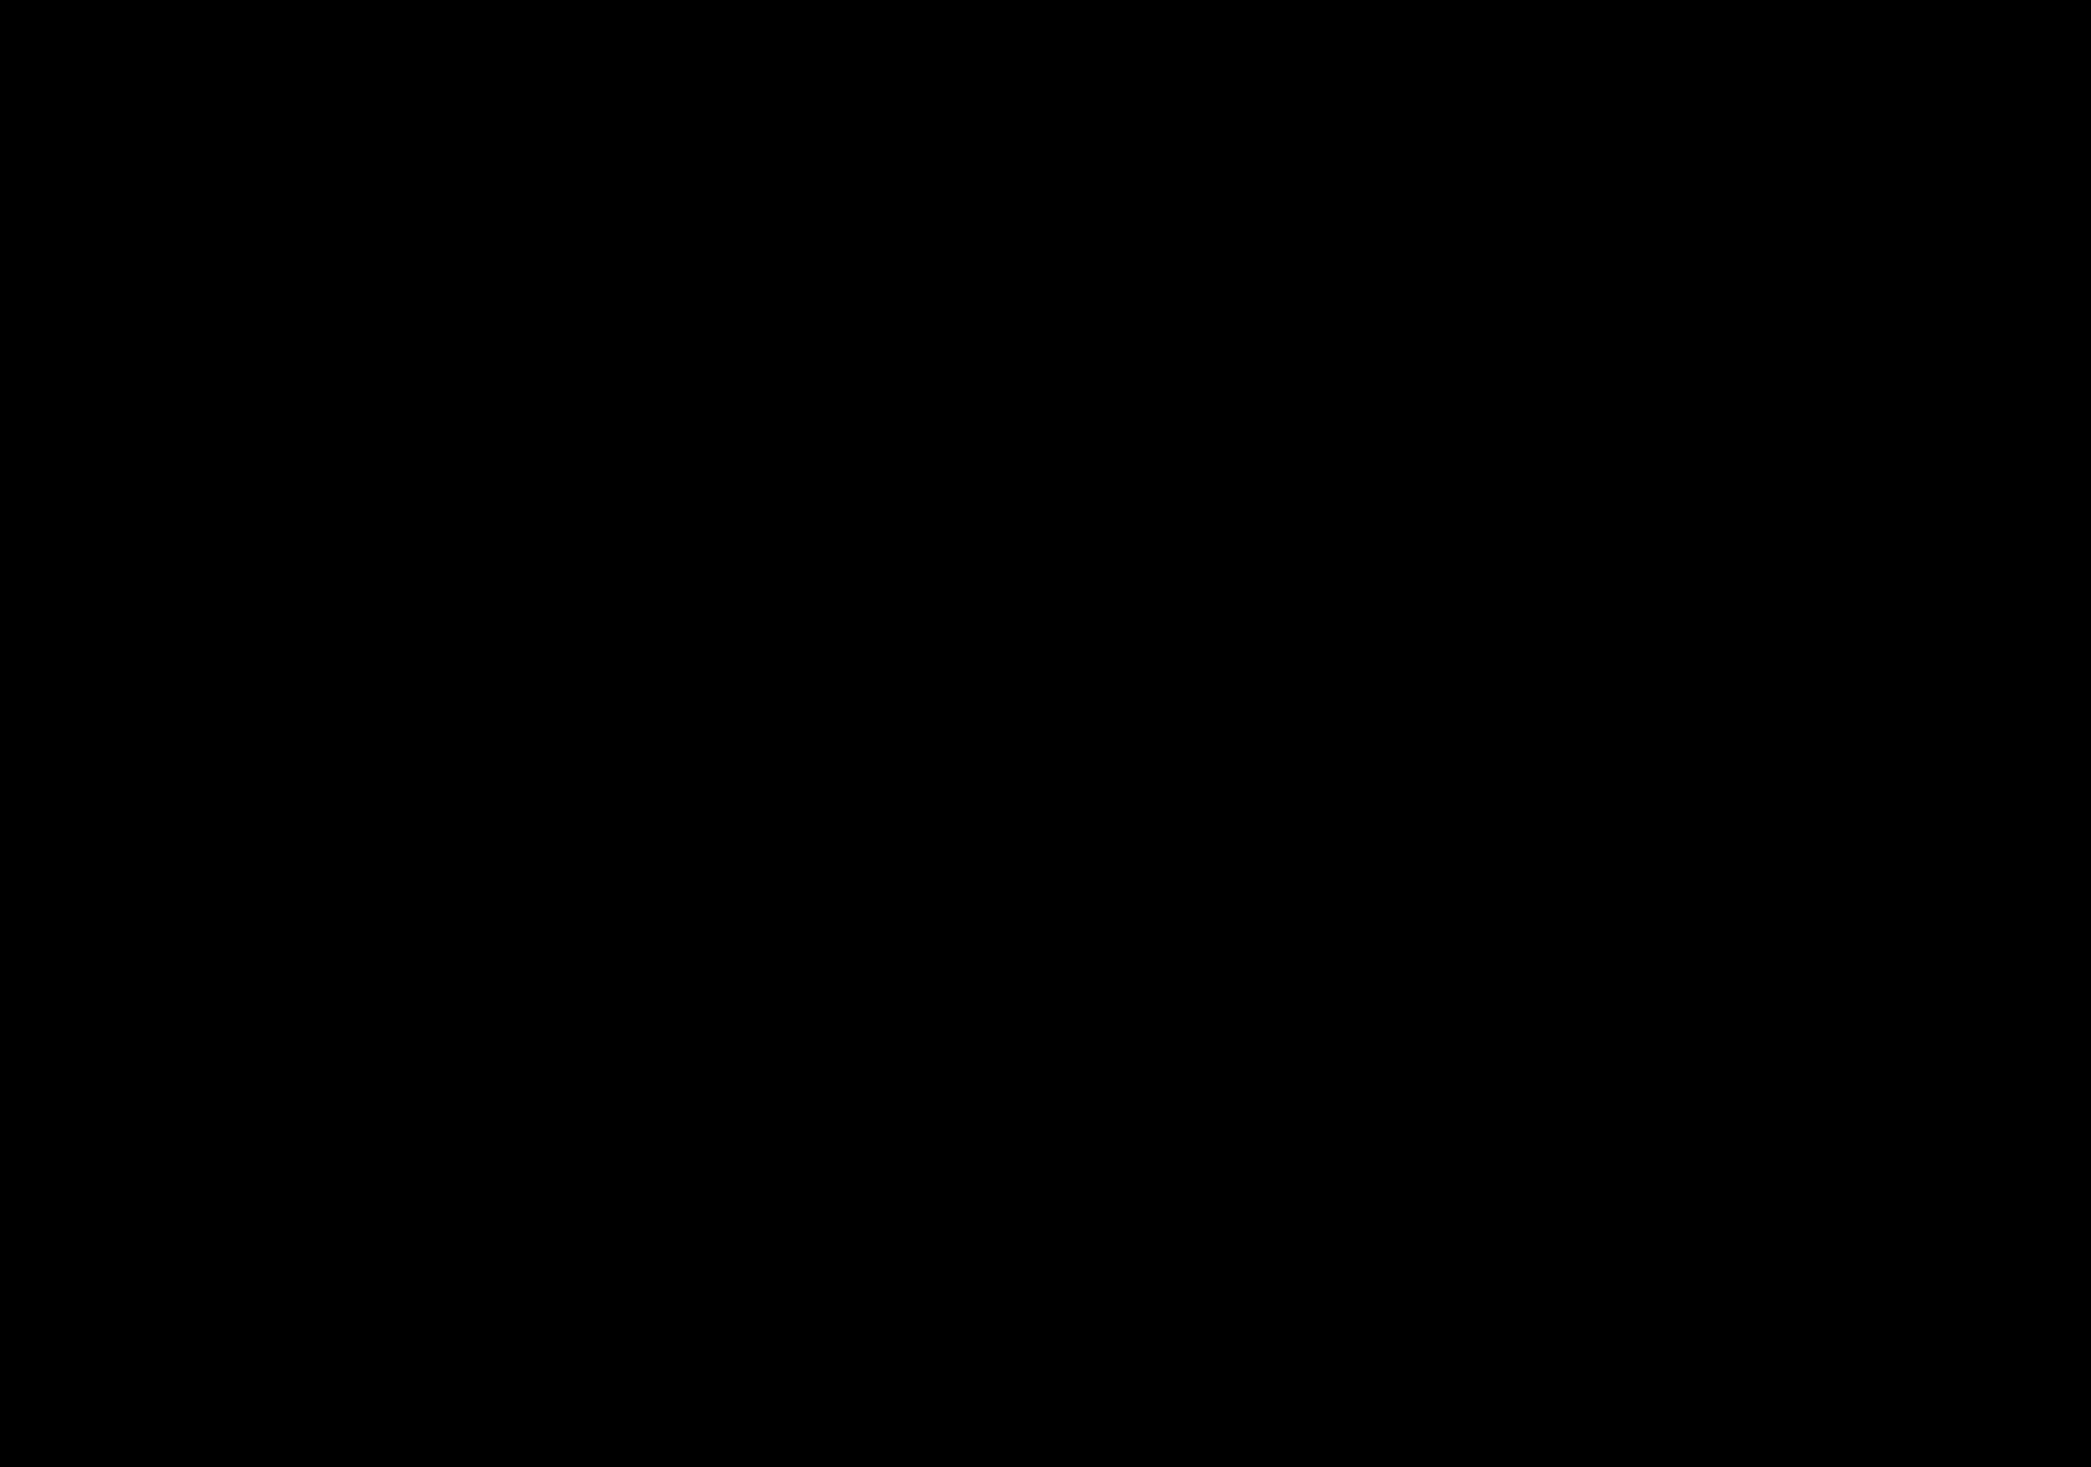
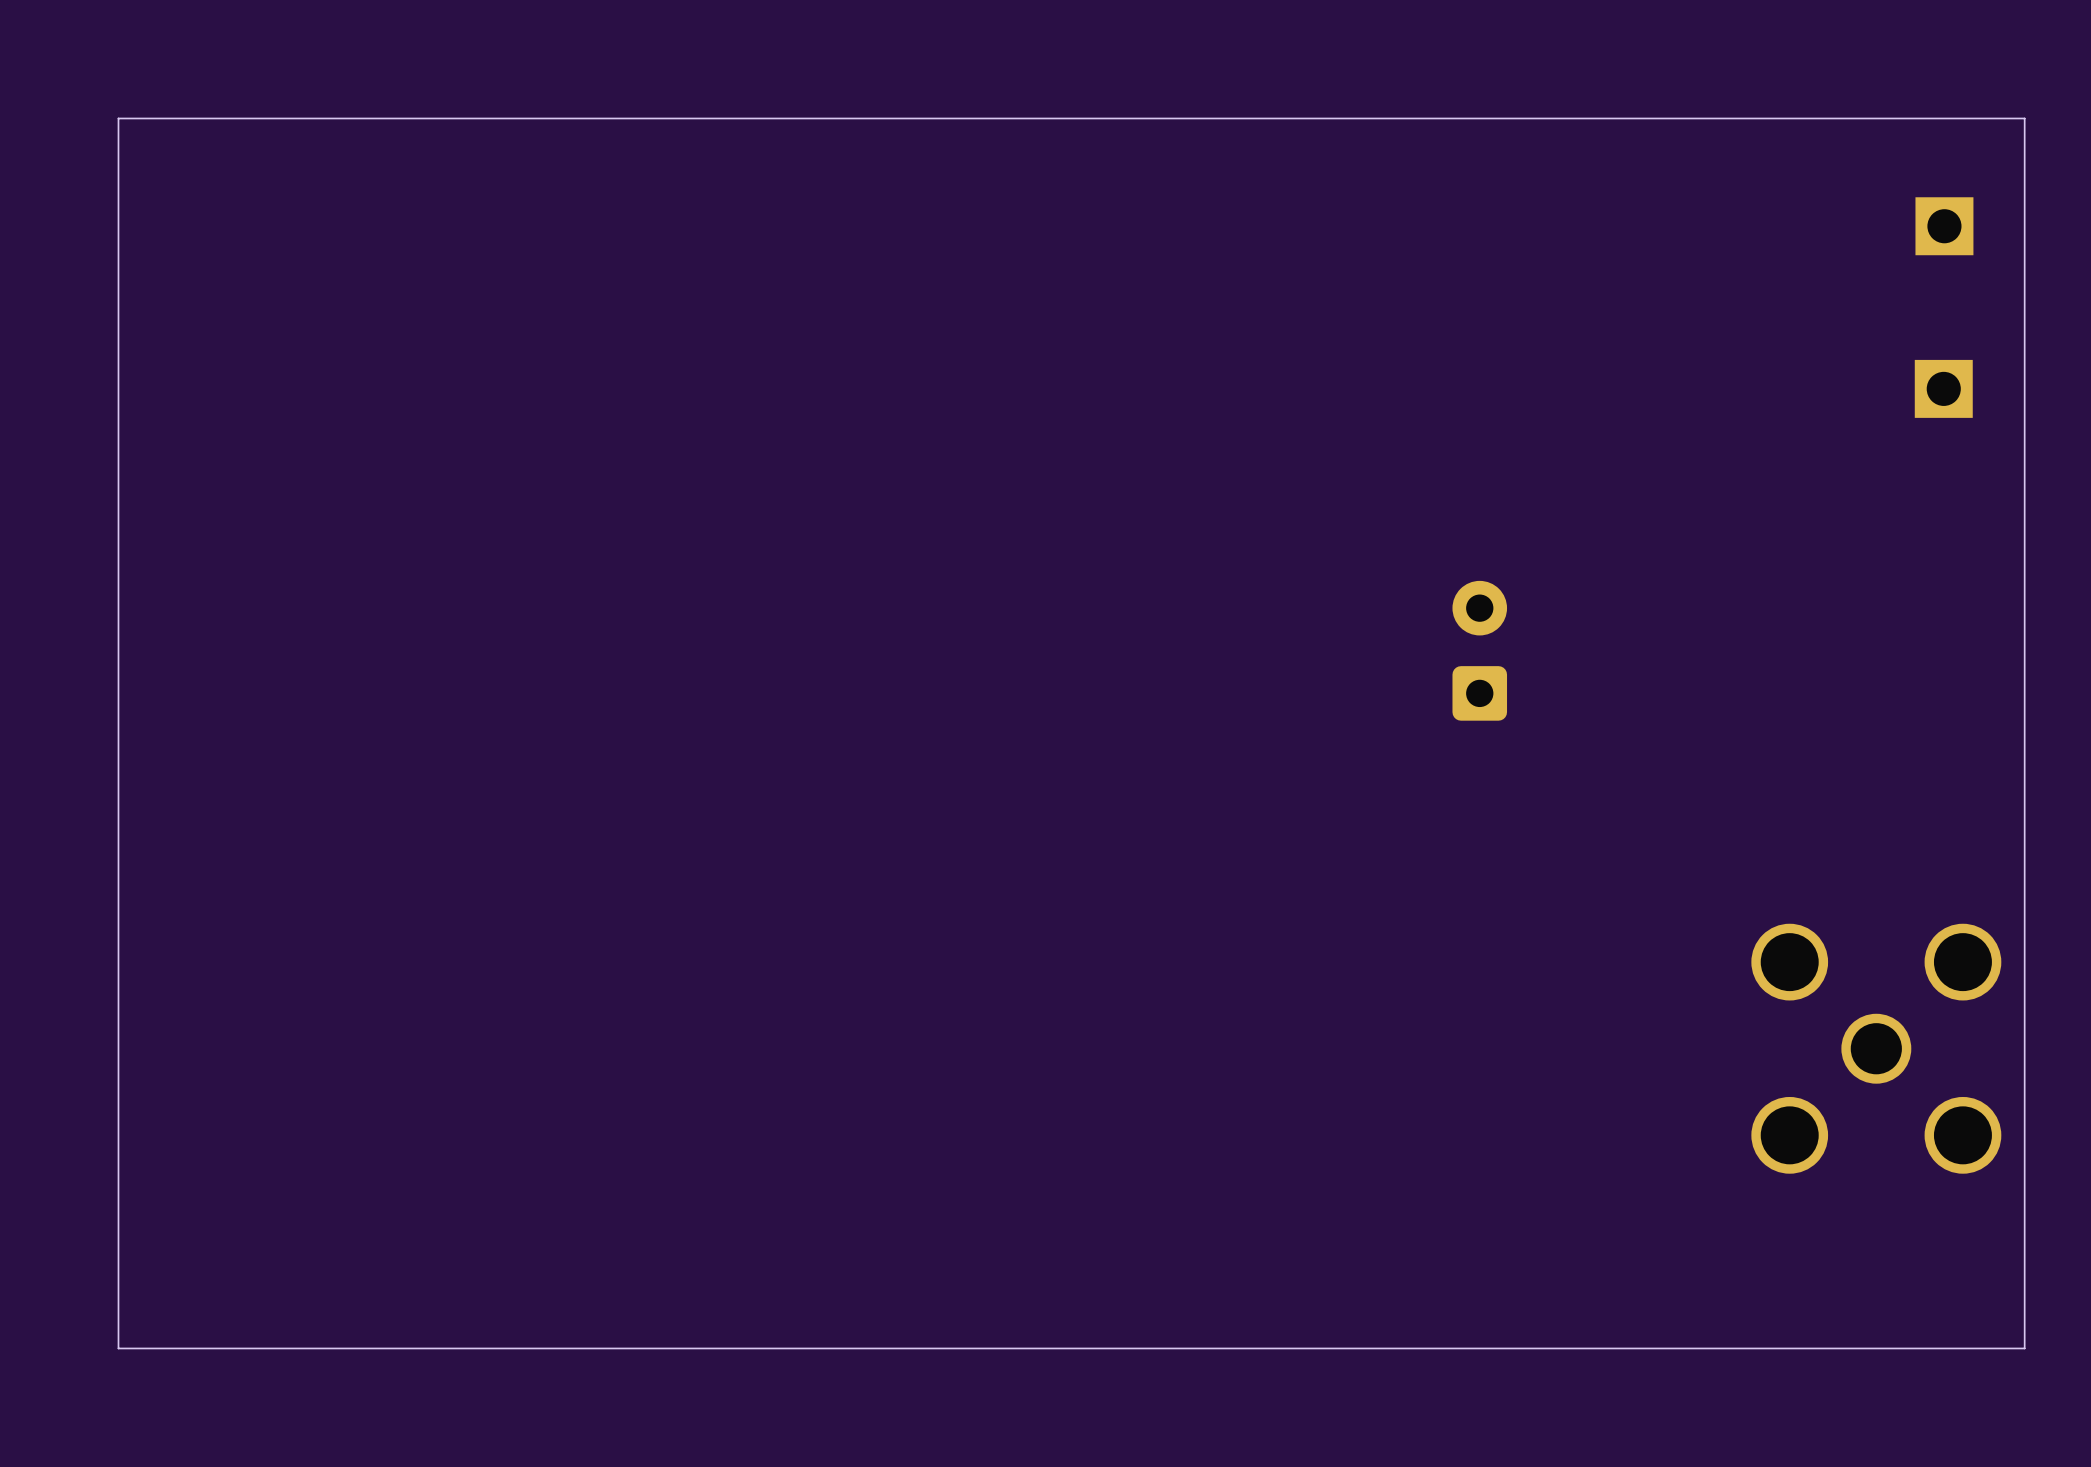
board edge: none -> (2024, 118) (118, 118) (118, 1348) (2024, 1348) (2024, 118)
part: none -> (1944, 226)
part: none -> (1943, 388)
part: none -> (1479, 650)
part: none -> (1876, 1048)

